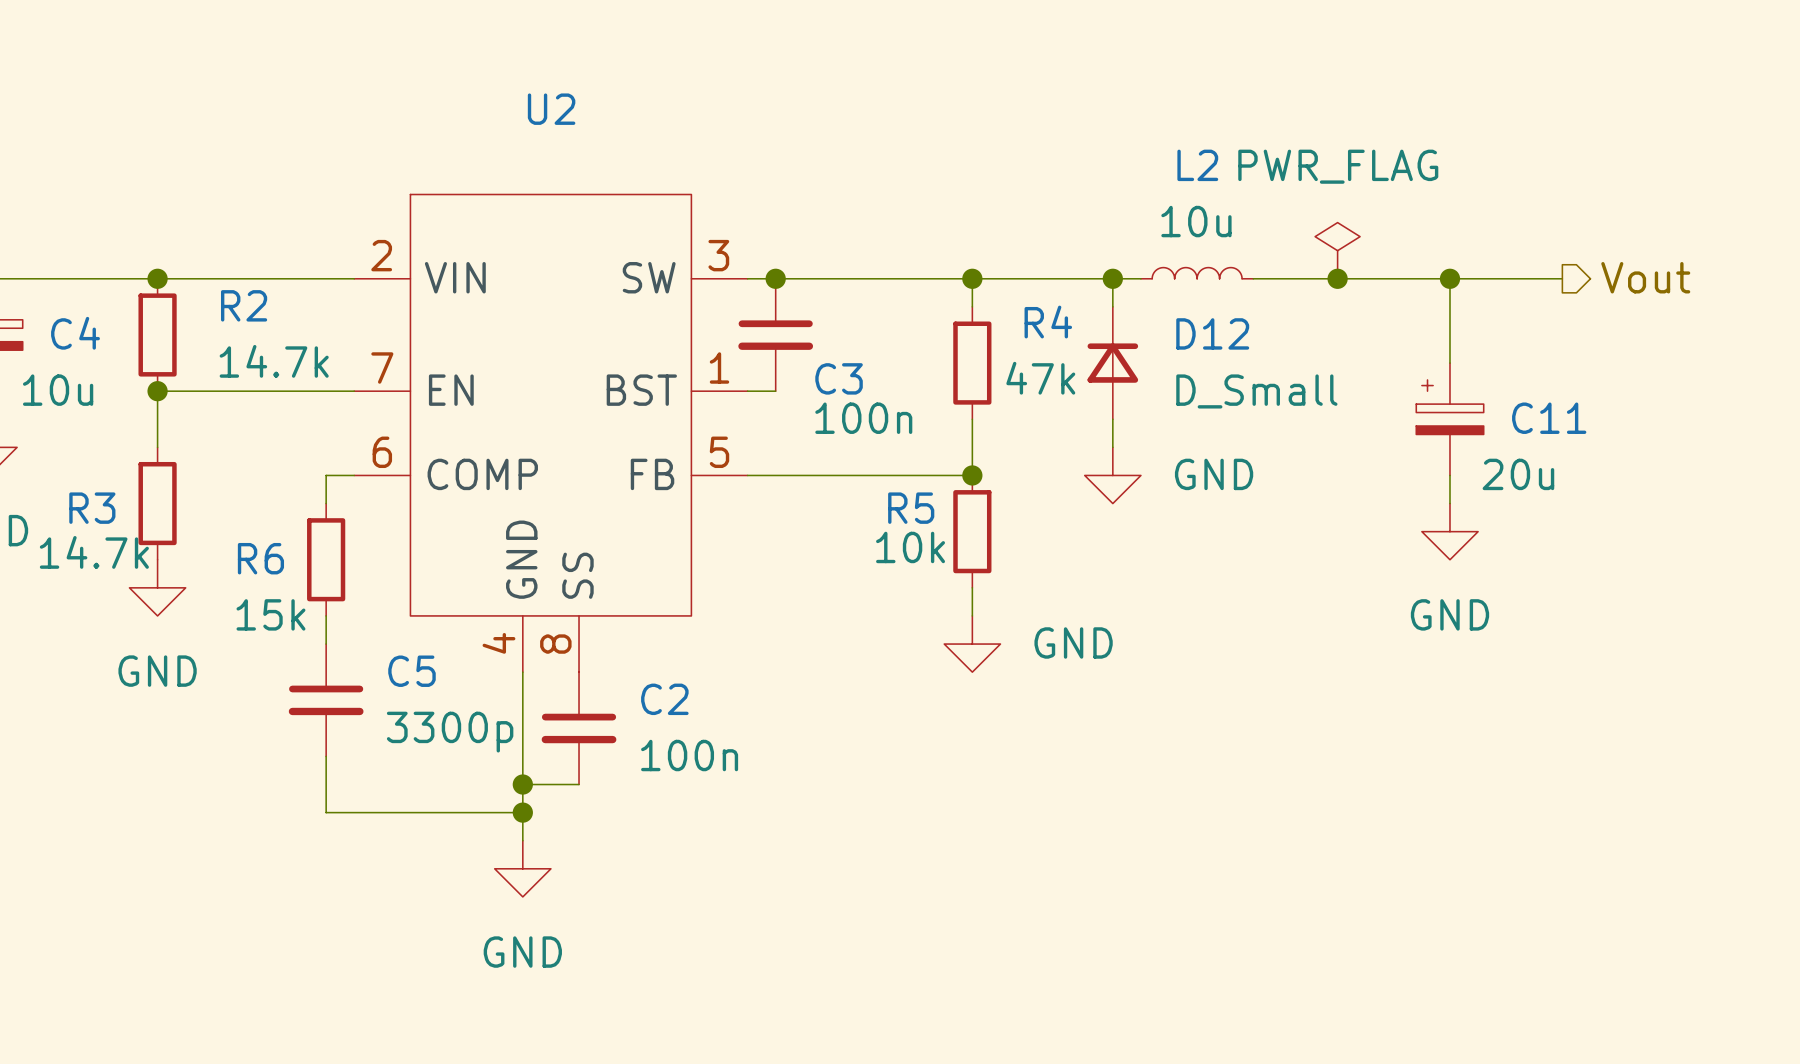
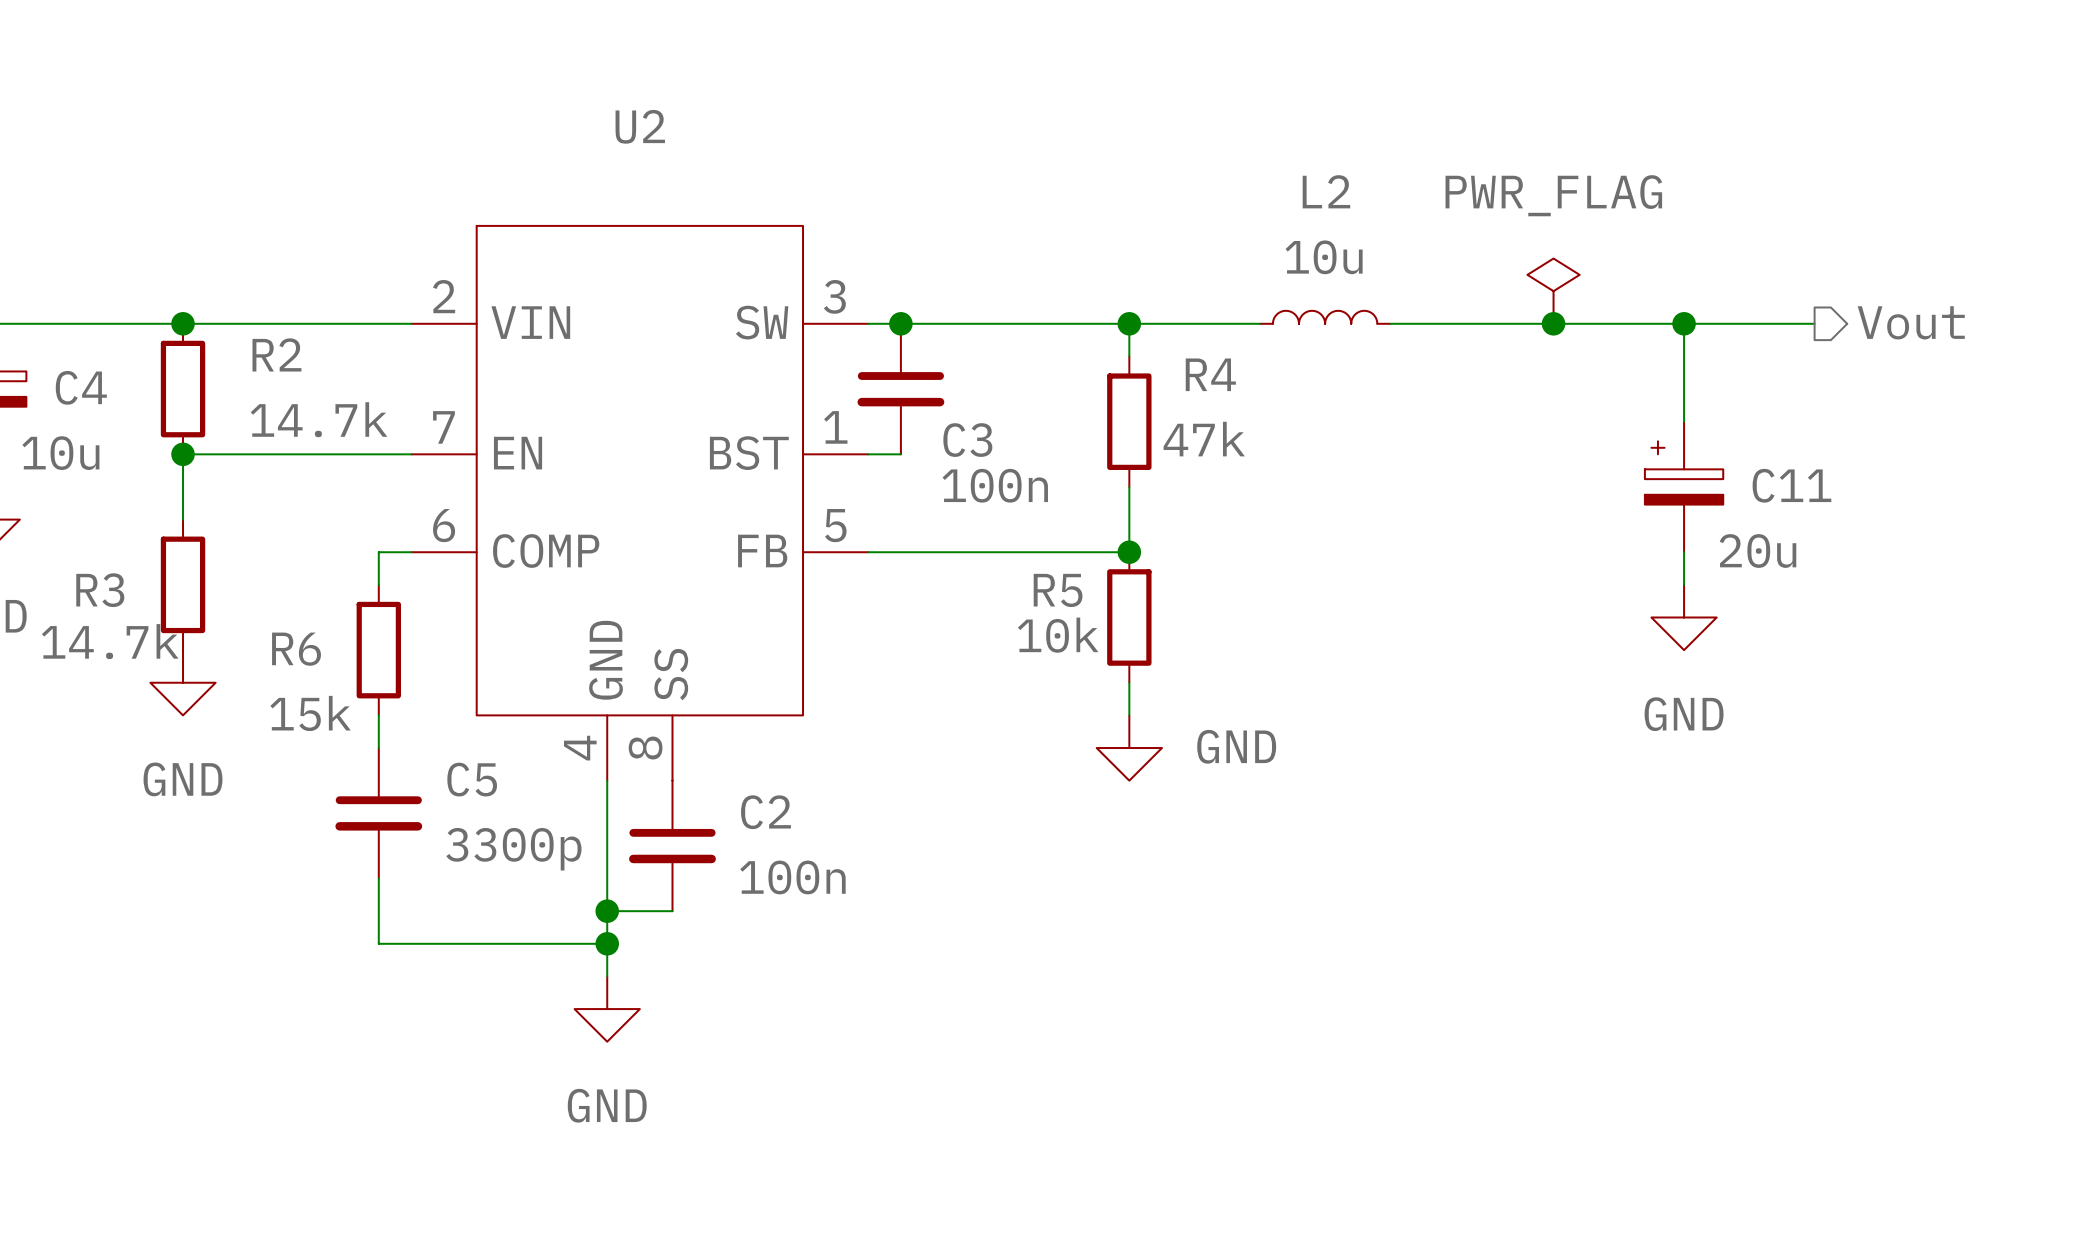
L2 position: (1197, 273) -> (1325, 317)
wire: (1084, 278) (1140, 278) -> (1390, 323) (1455, 323)
wire: (1112, 278) (1112, 306) -> none
junction: (1112, 278) -> none
D12: D_Small (1112, 363) -> none
wire: (1112, 419) (1112, 447) -> none
power symbol: GND (1112, 475) -> none

